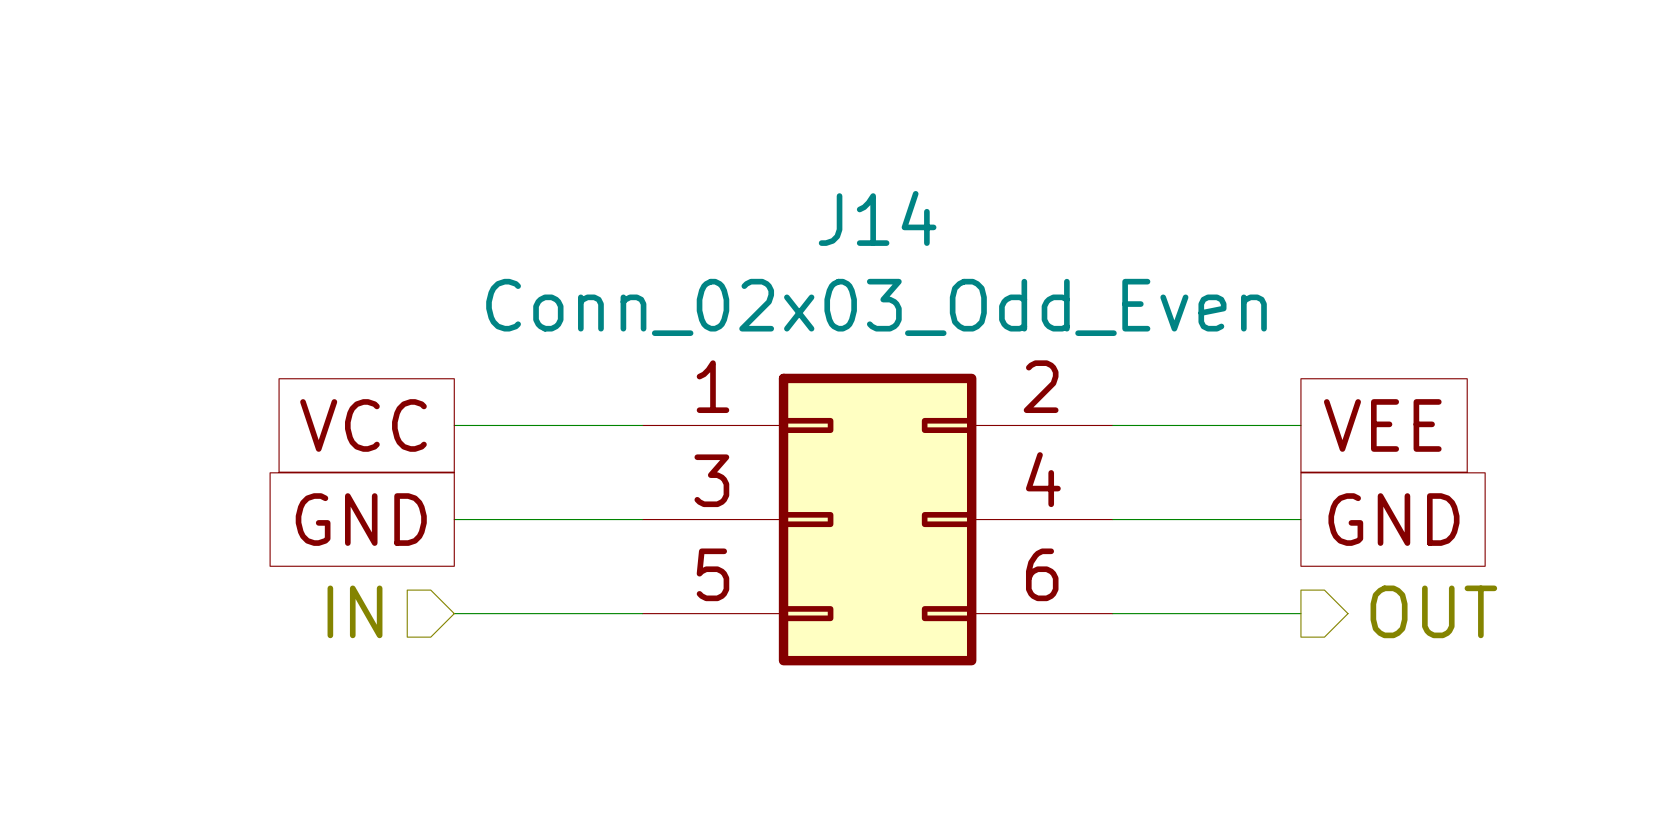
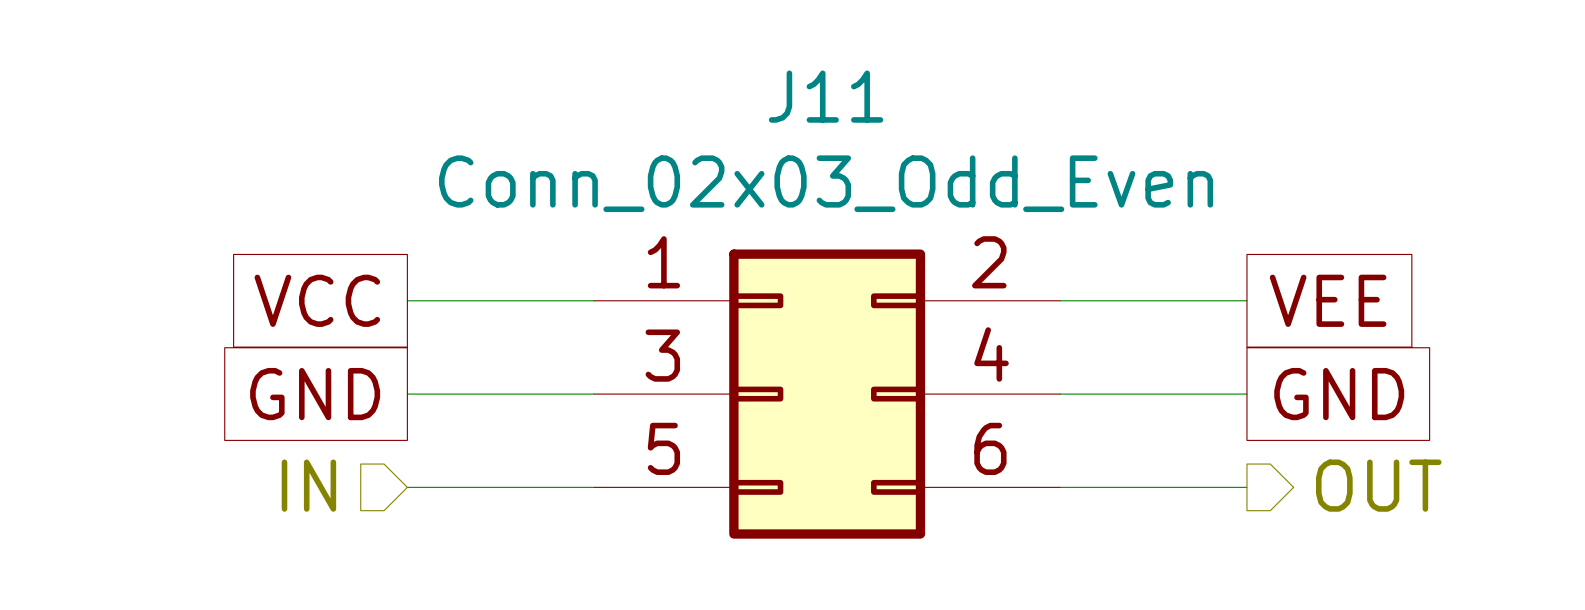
J14 name: J14 (877, 218) -> J11 (826, 96)

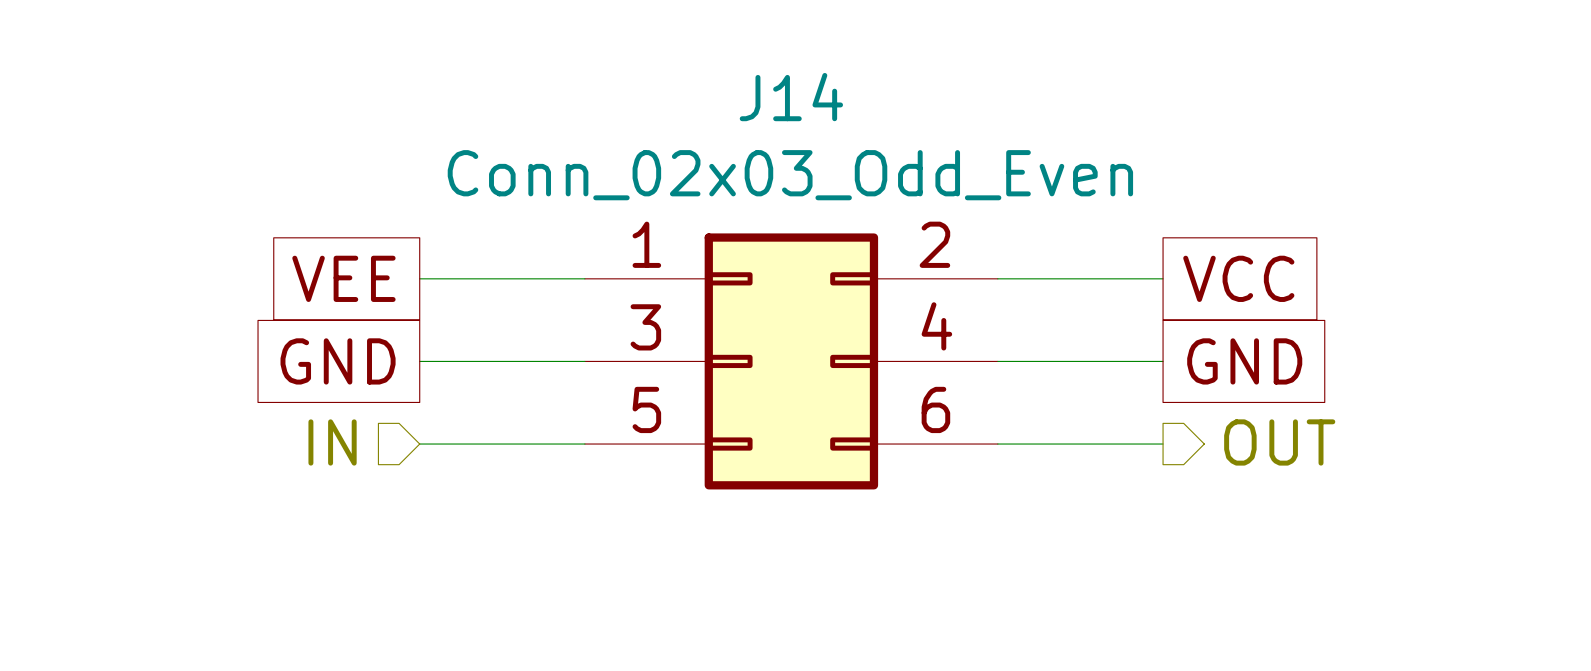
J11 name: J11 (826, 96) -> J14 (791, 97)
global label: VCC (317, 300) -> VEE (343, 278)
global label: VEE (1328, 300) -> VCC (1238, 278)

